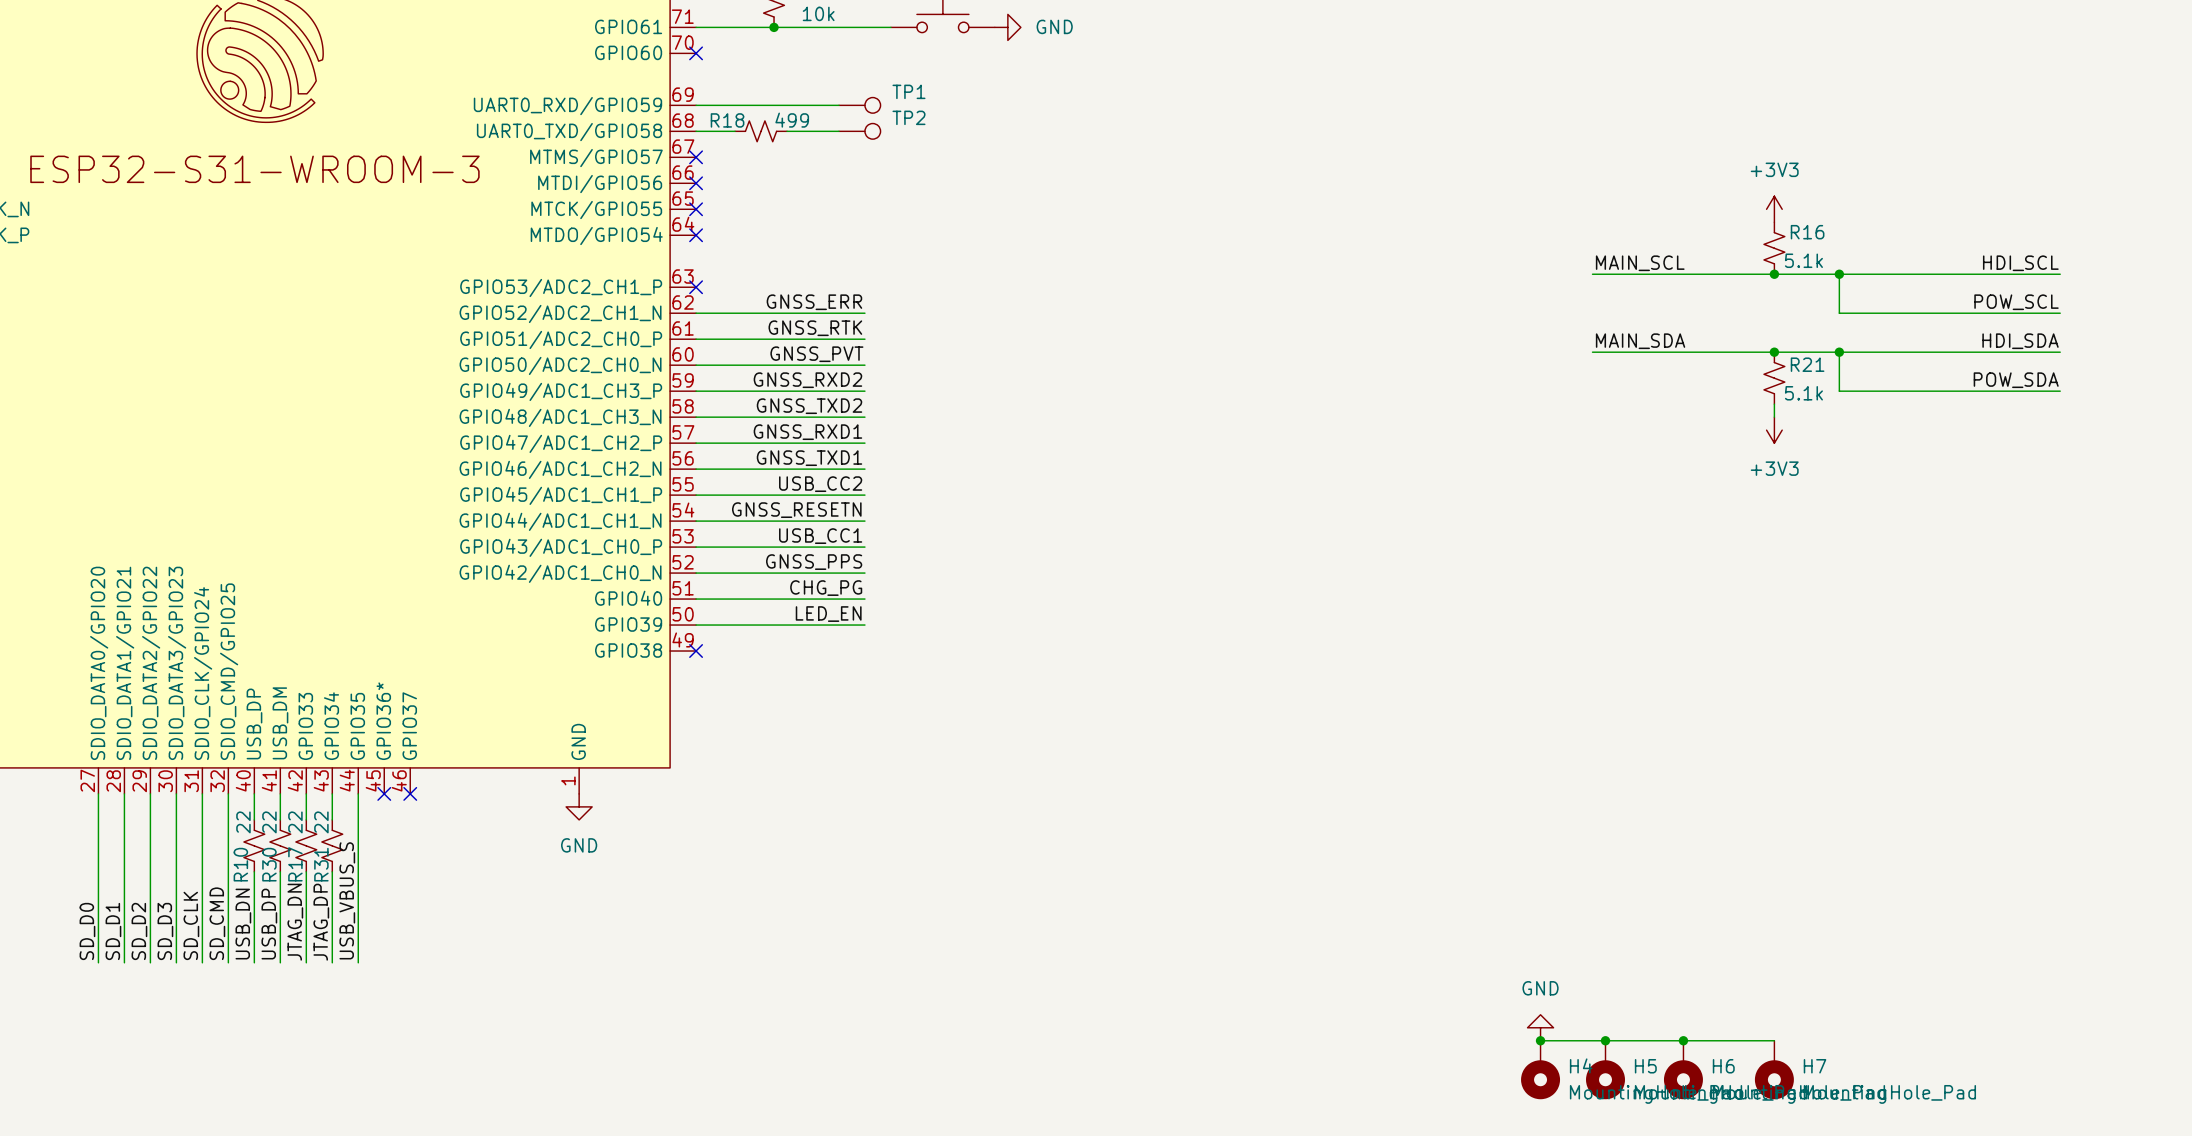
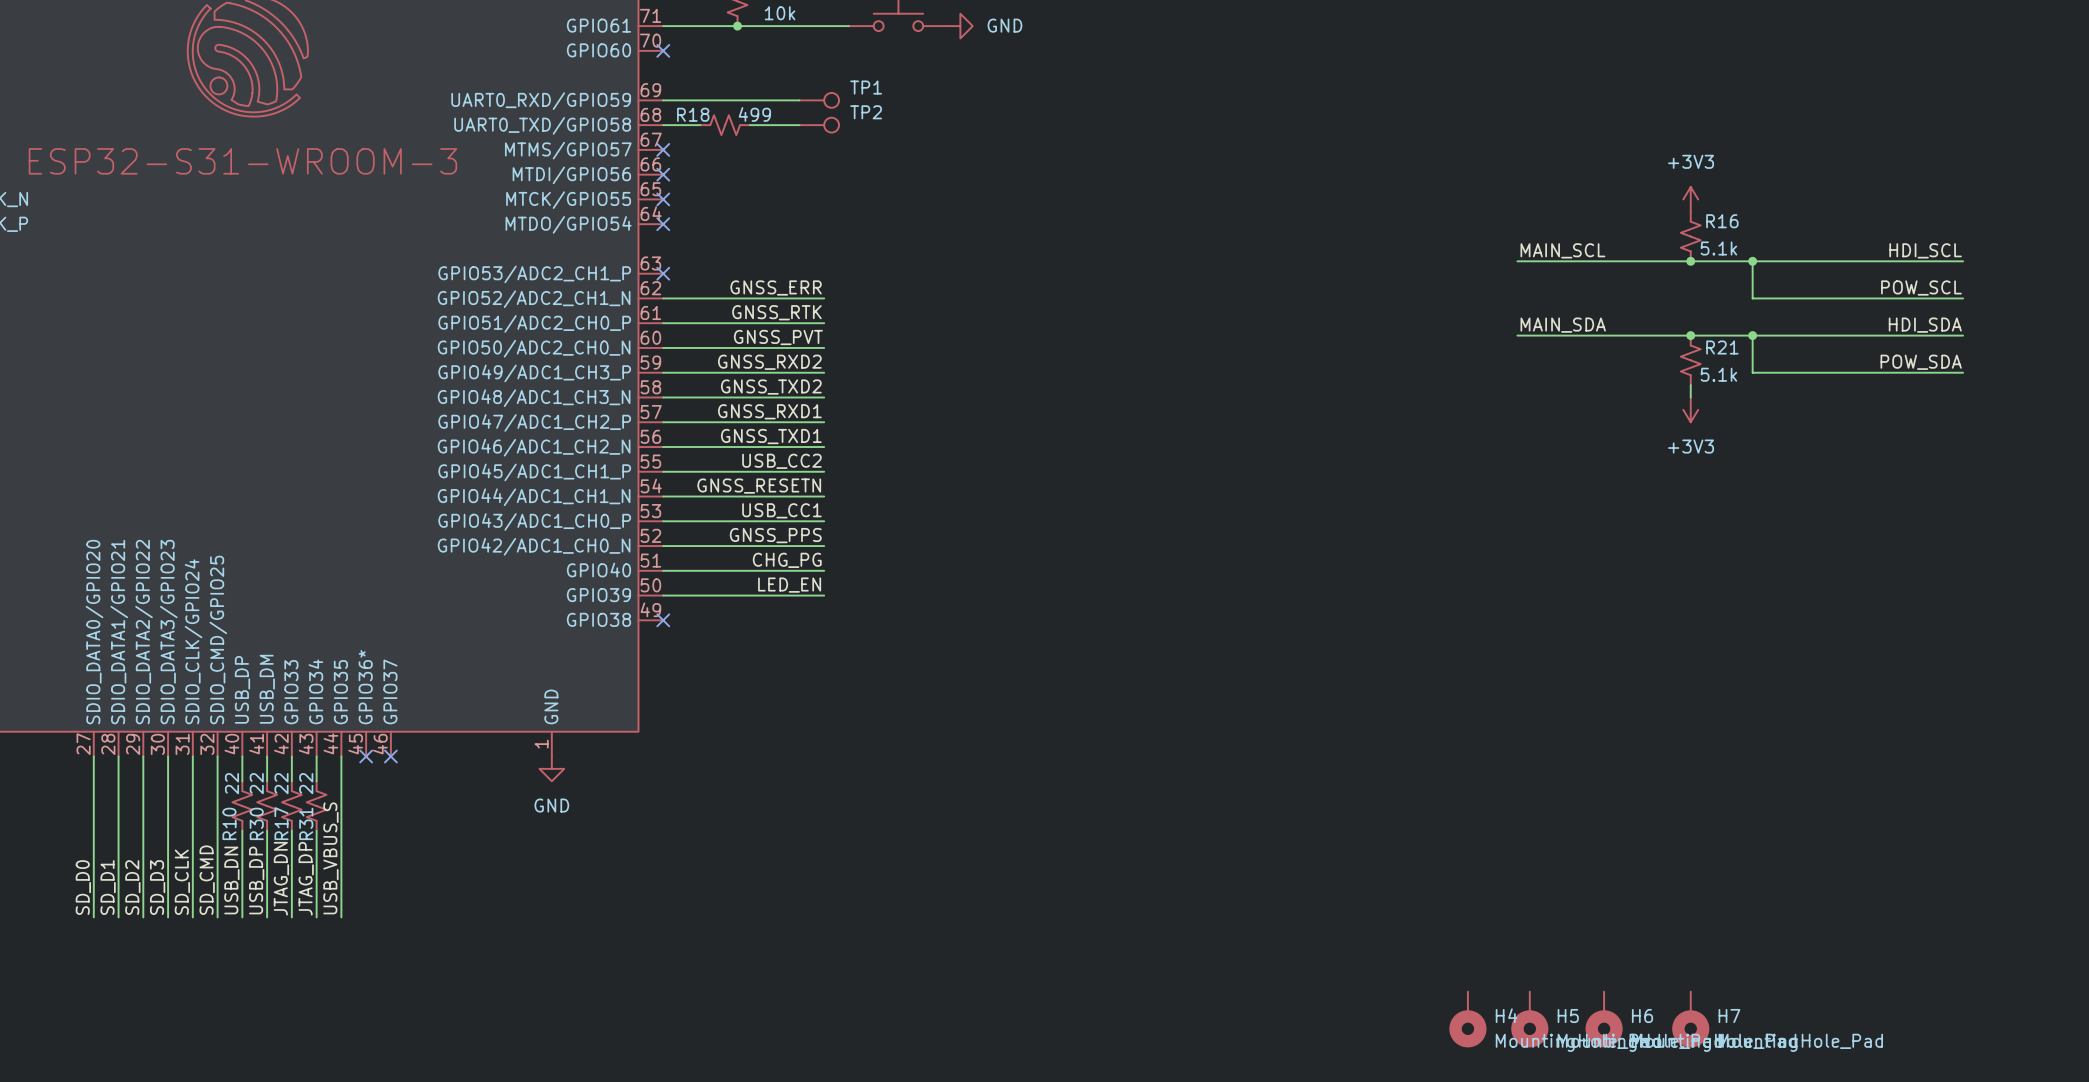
power symbol: GND (1540, 1027) -> none
wire: (1540, 1040) (1774, 1040) -> none
junction: (1540, 1040) -> none
junction: (1605, 1040) -> none
junction: (1683, 1040) -> none

